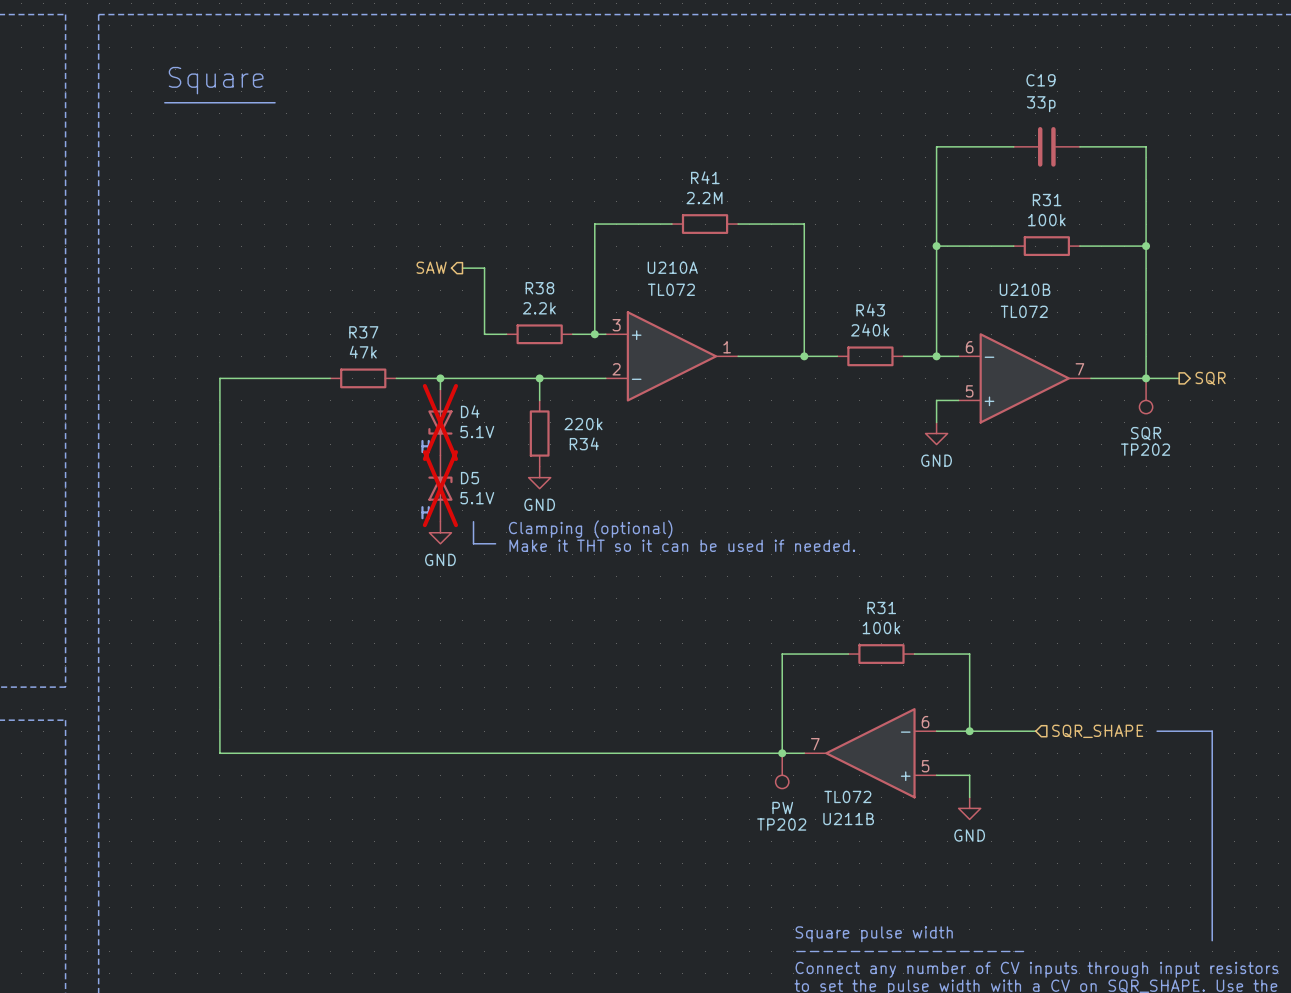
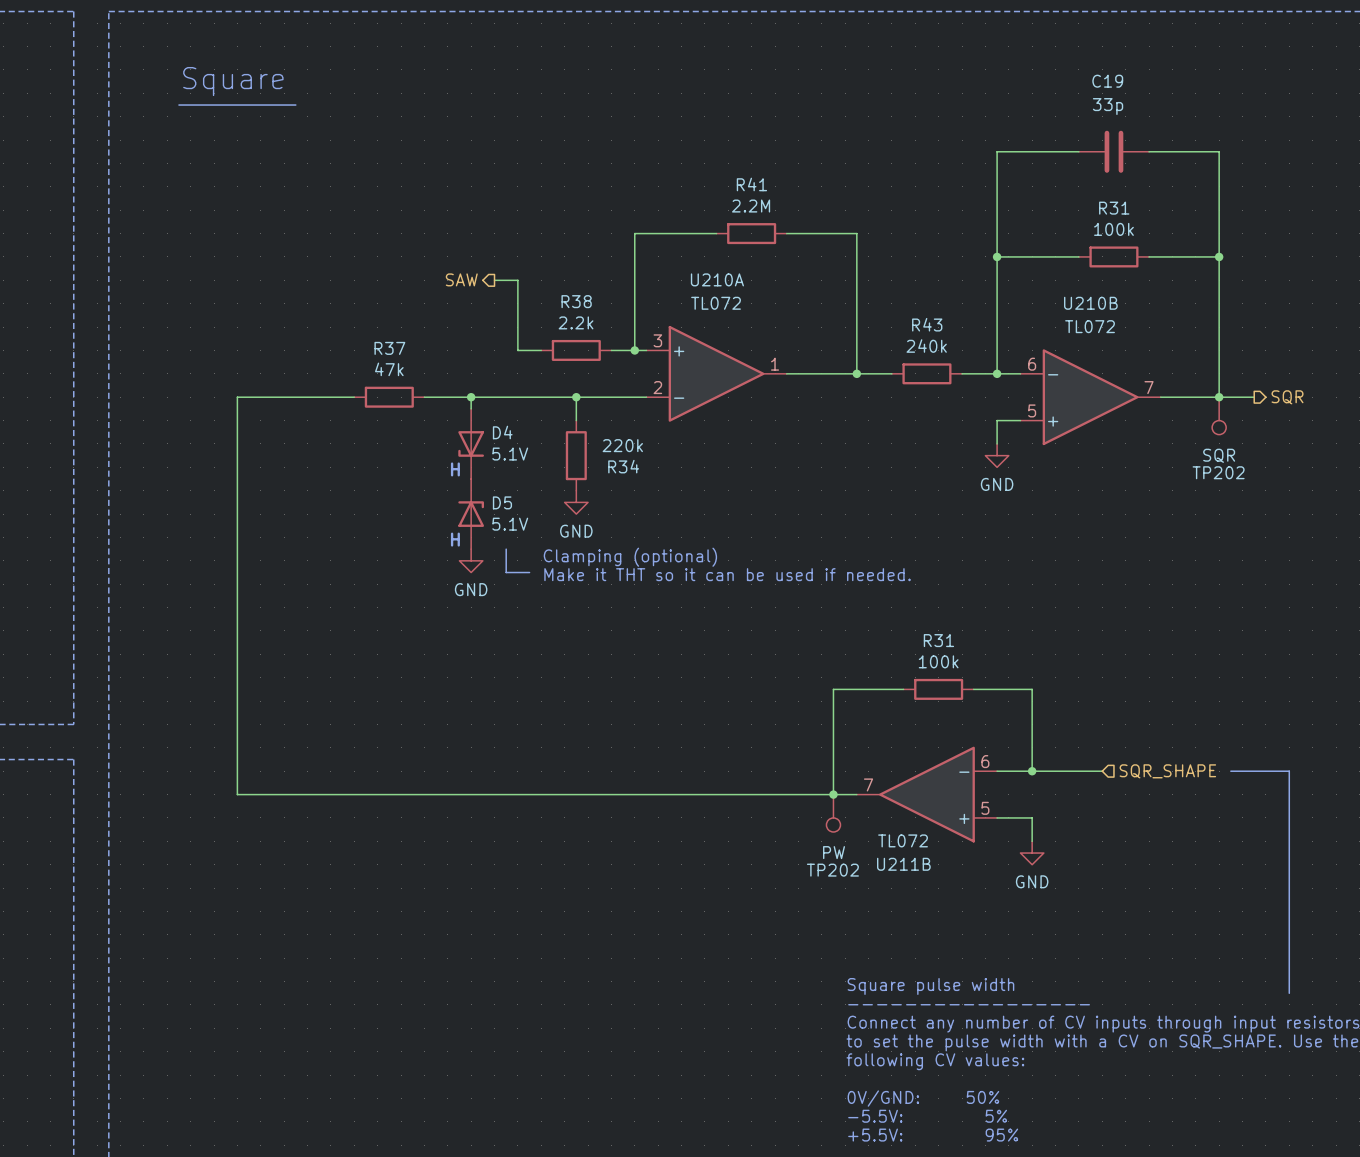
D4 do-not-place cross: (440, 422) -> none
D5 do-not-place cross: (440, 488) -> none

